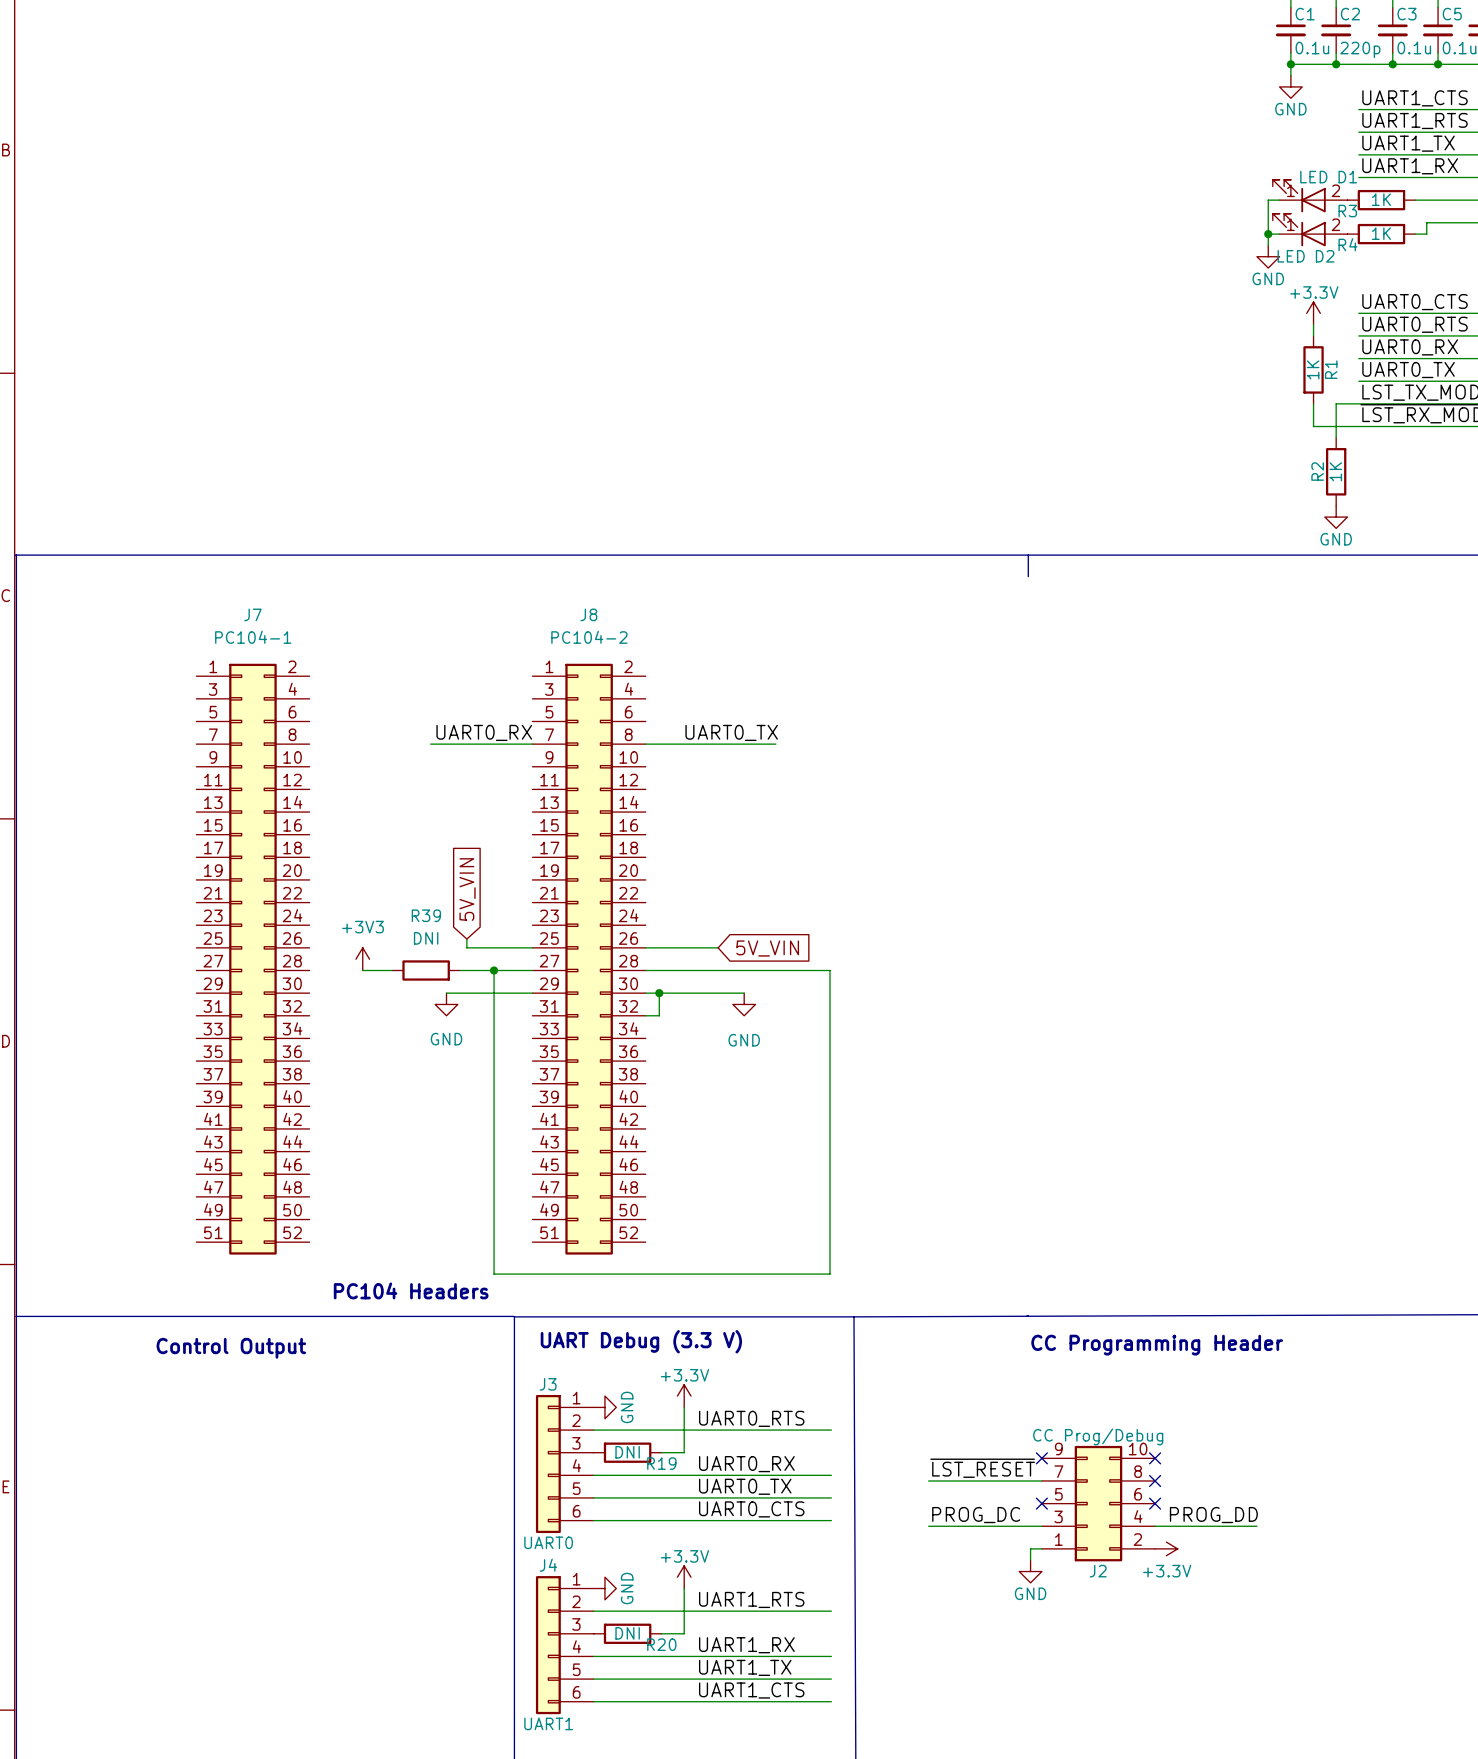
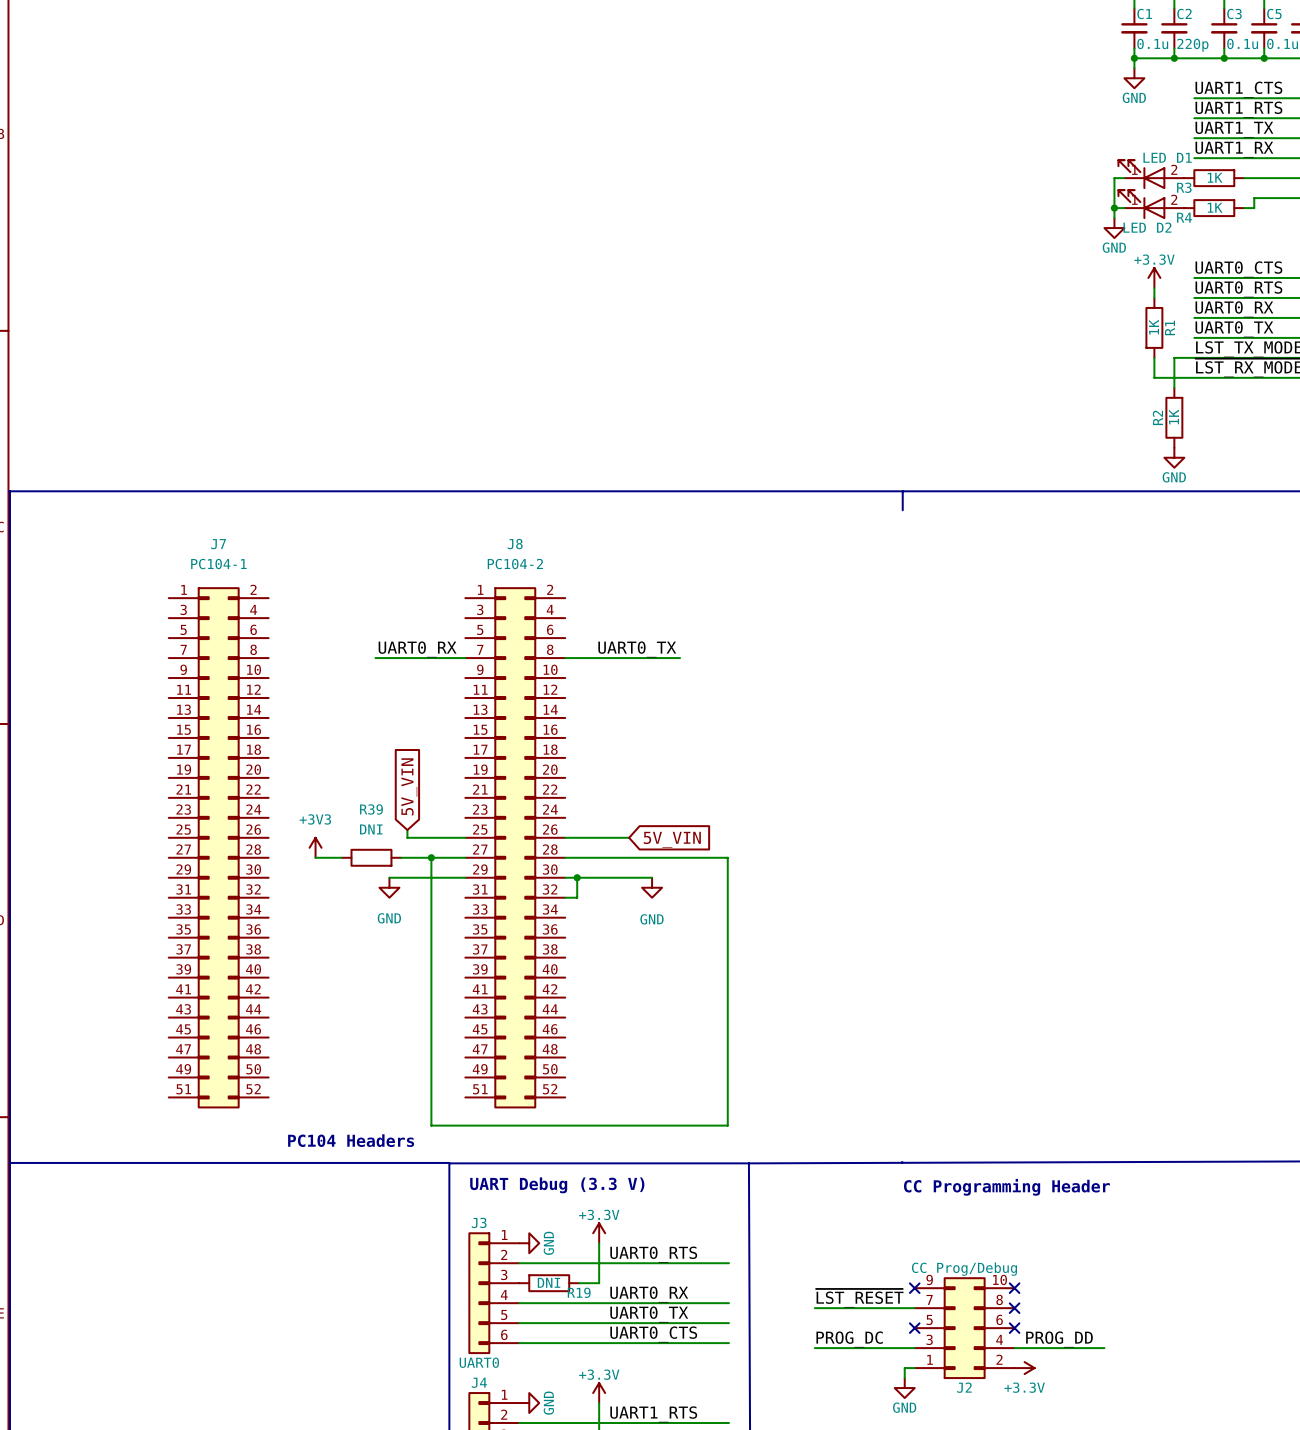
text: Control Output (231, 1348) -> none

